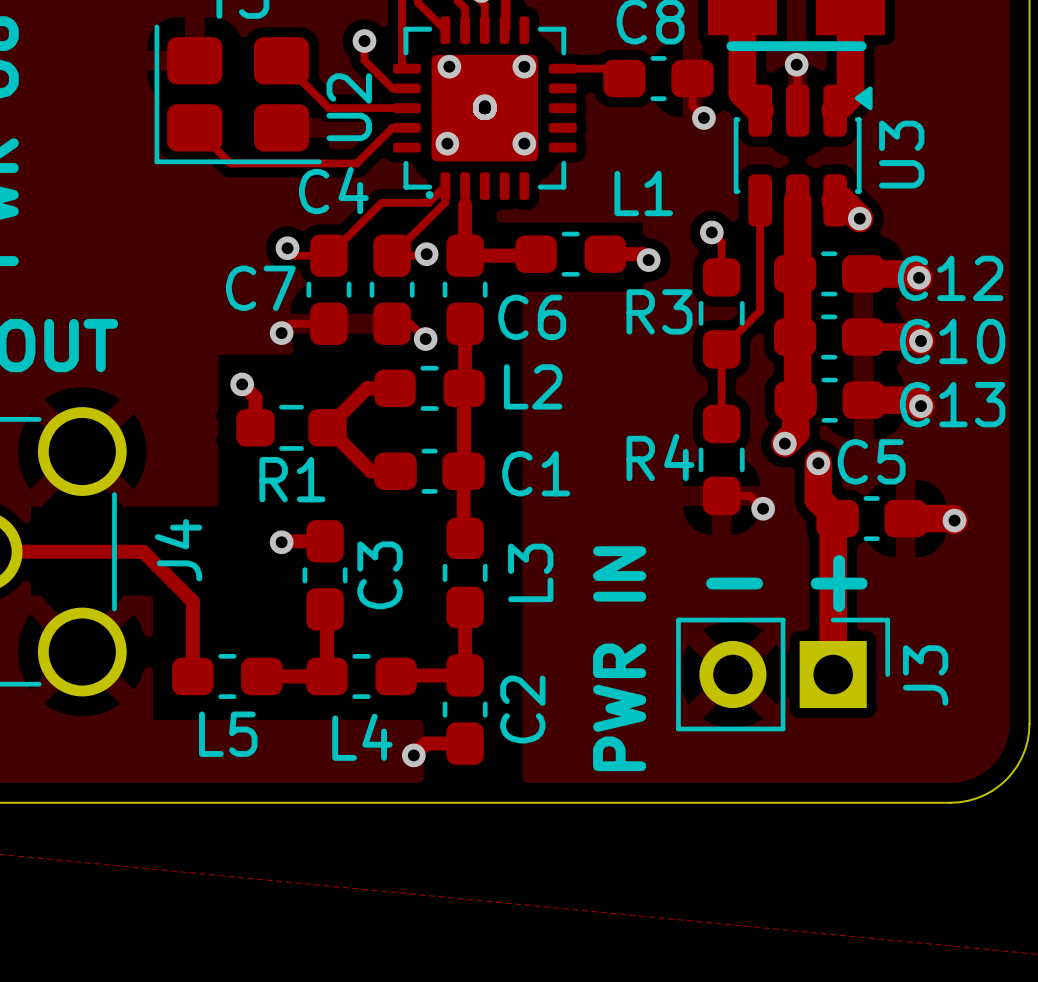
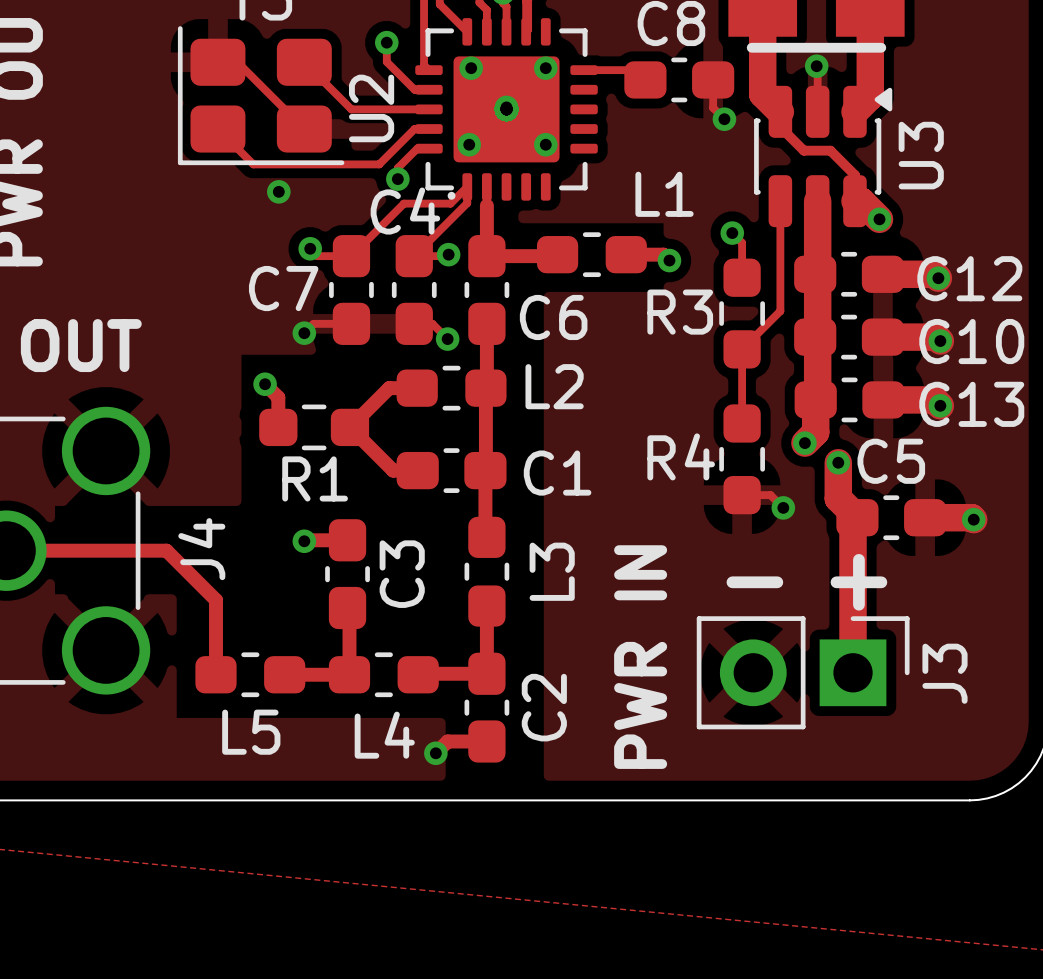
track: none -> (217, 62) (237, 62) (304, 129)
track: none -> (780, 111) (780, 127) (803, 150) (830, 150) (854, 175) (854, 201)
track: none -> (428, 148) (417, 148) (397, 168) (397, 179)
via: none -> (397, 179)
C4 name position: C4 (333, 190) -> C4 (405, 211)
via: none -> (278, 191)

